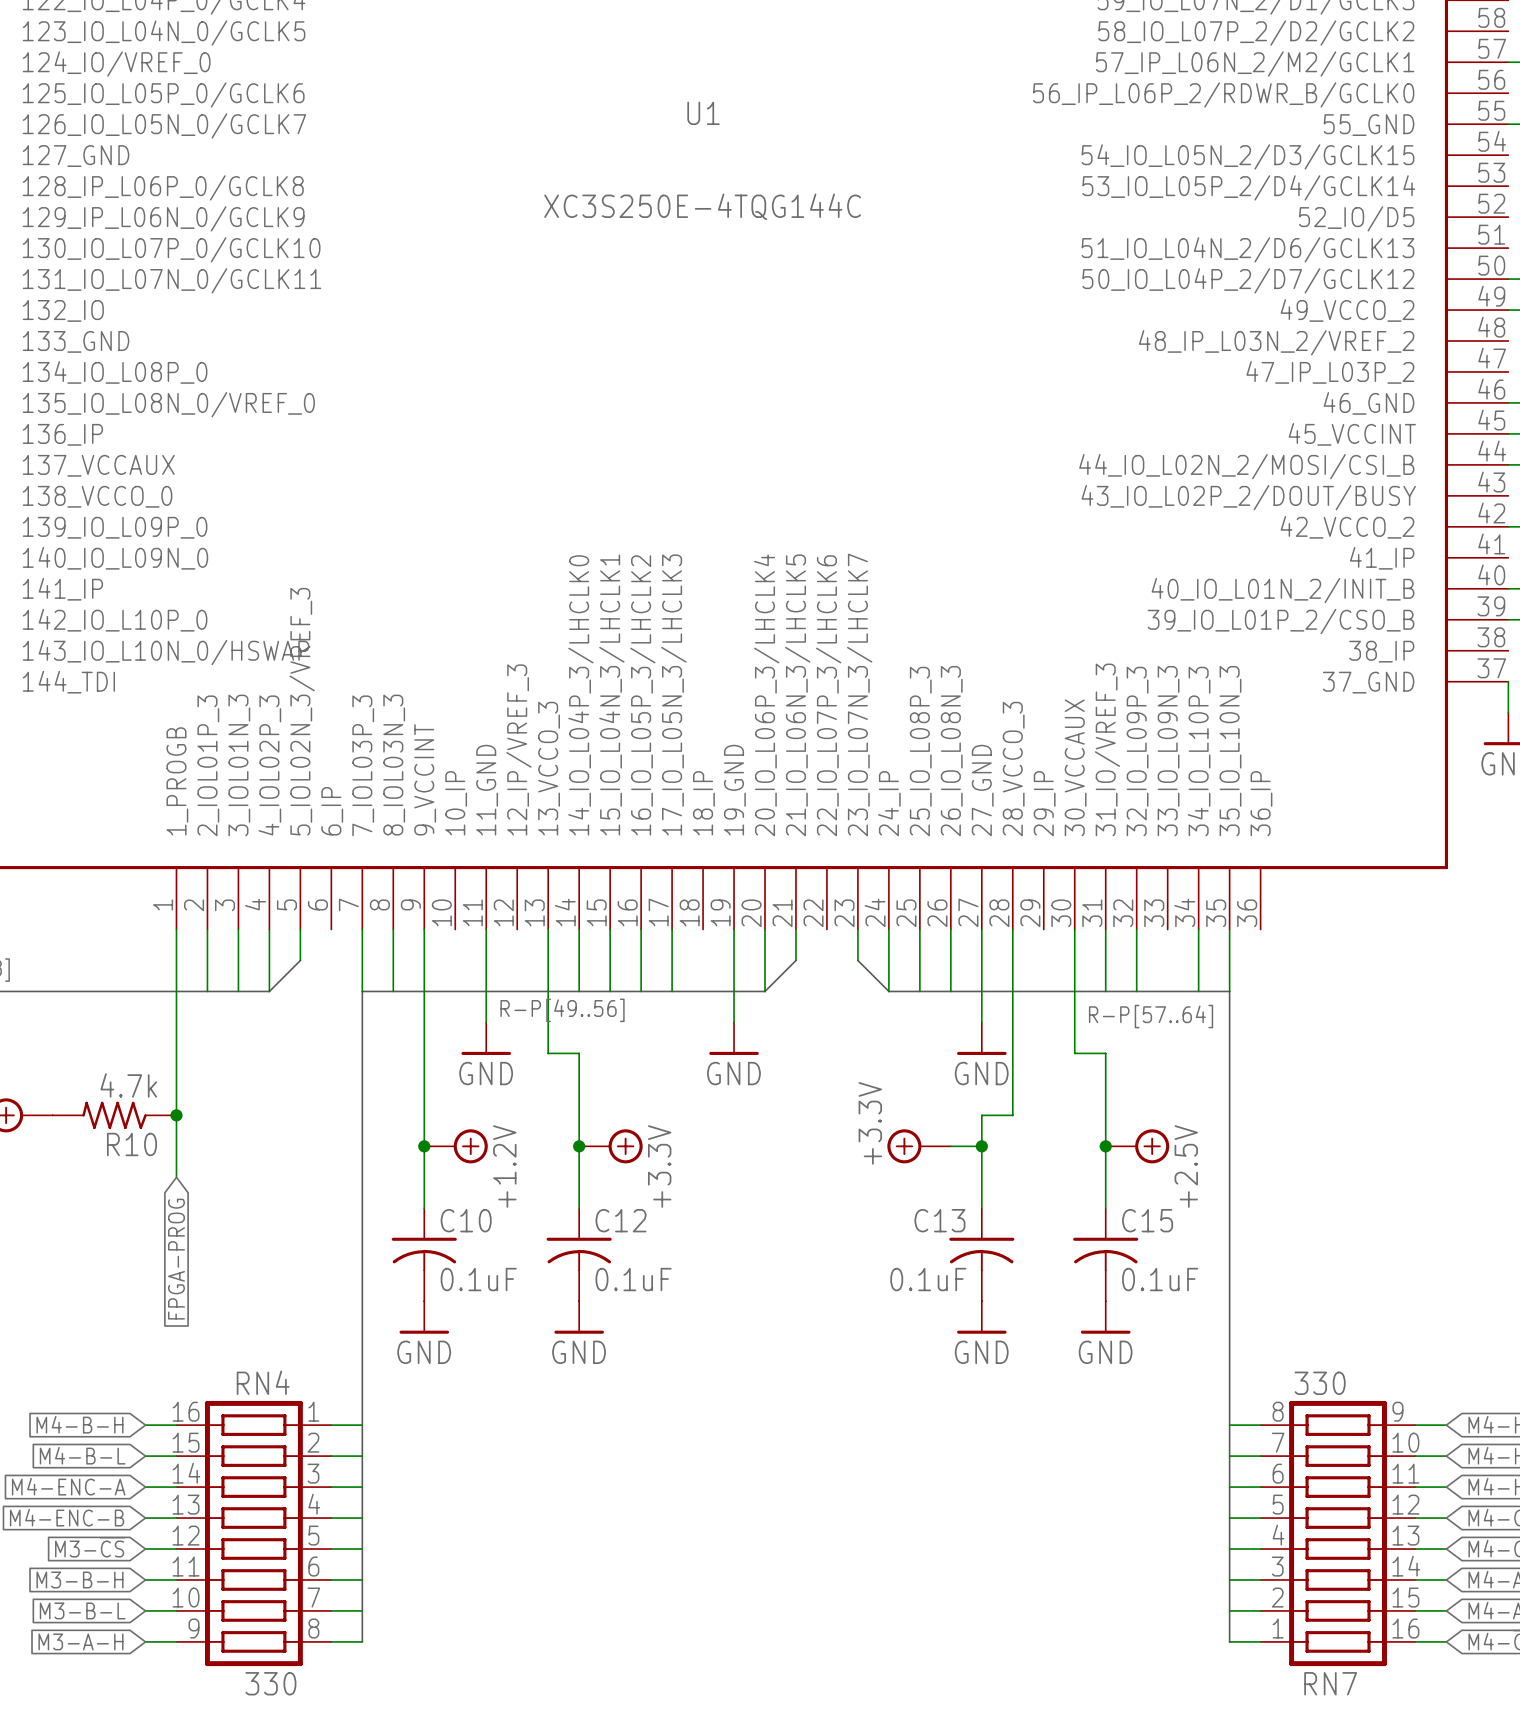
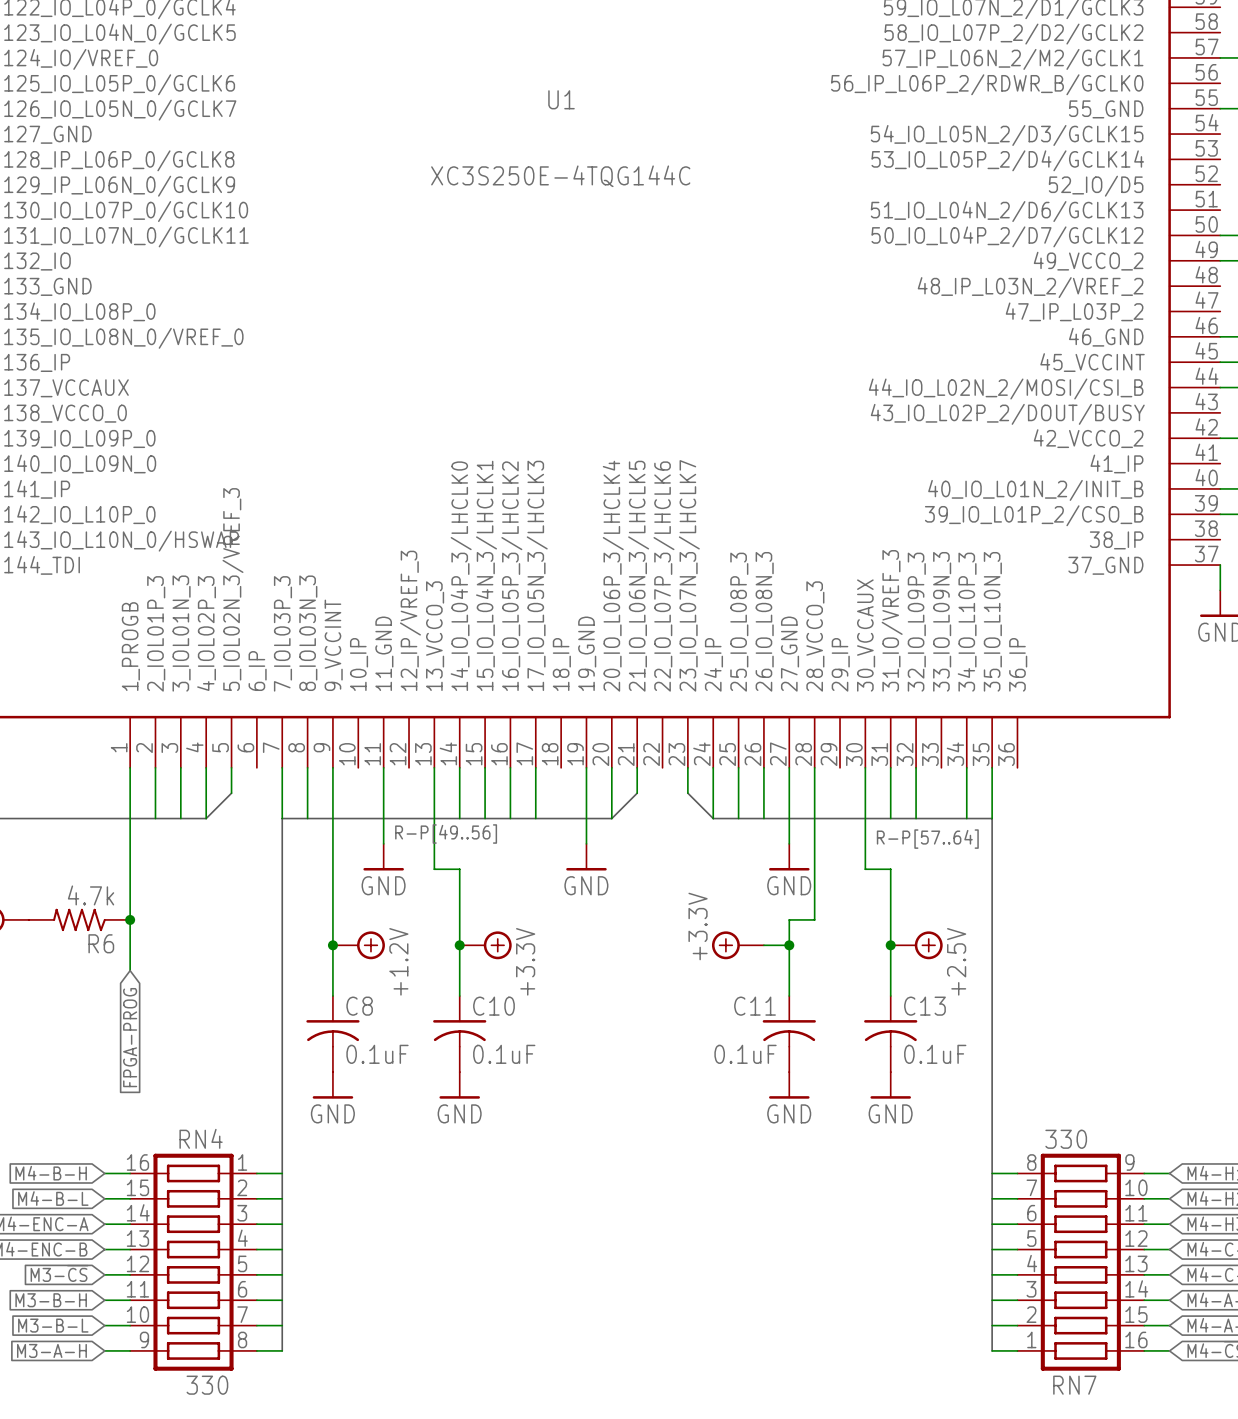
R10 name: R10 (131, 1144) -> R6 (101, 943)
C10 name: C10 (466, 1220) -> C8 (359, 1006)
C12 name: C12 (621, 1220) -> C10 (493, 1006)
C13 name: C13 (939, 1220) -> C11 (755, 1006)
C15 name: C15 (1147, 1220) -> C13 (924, 1006)

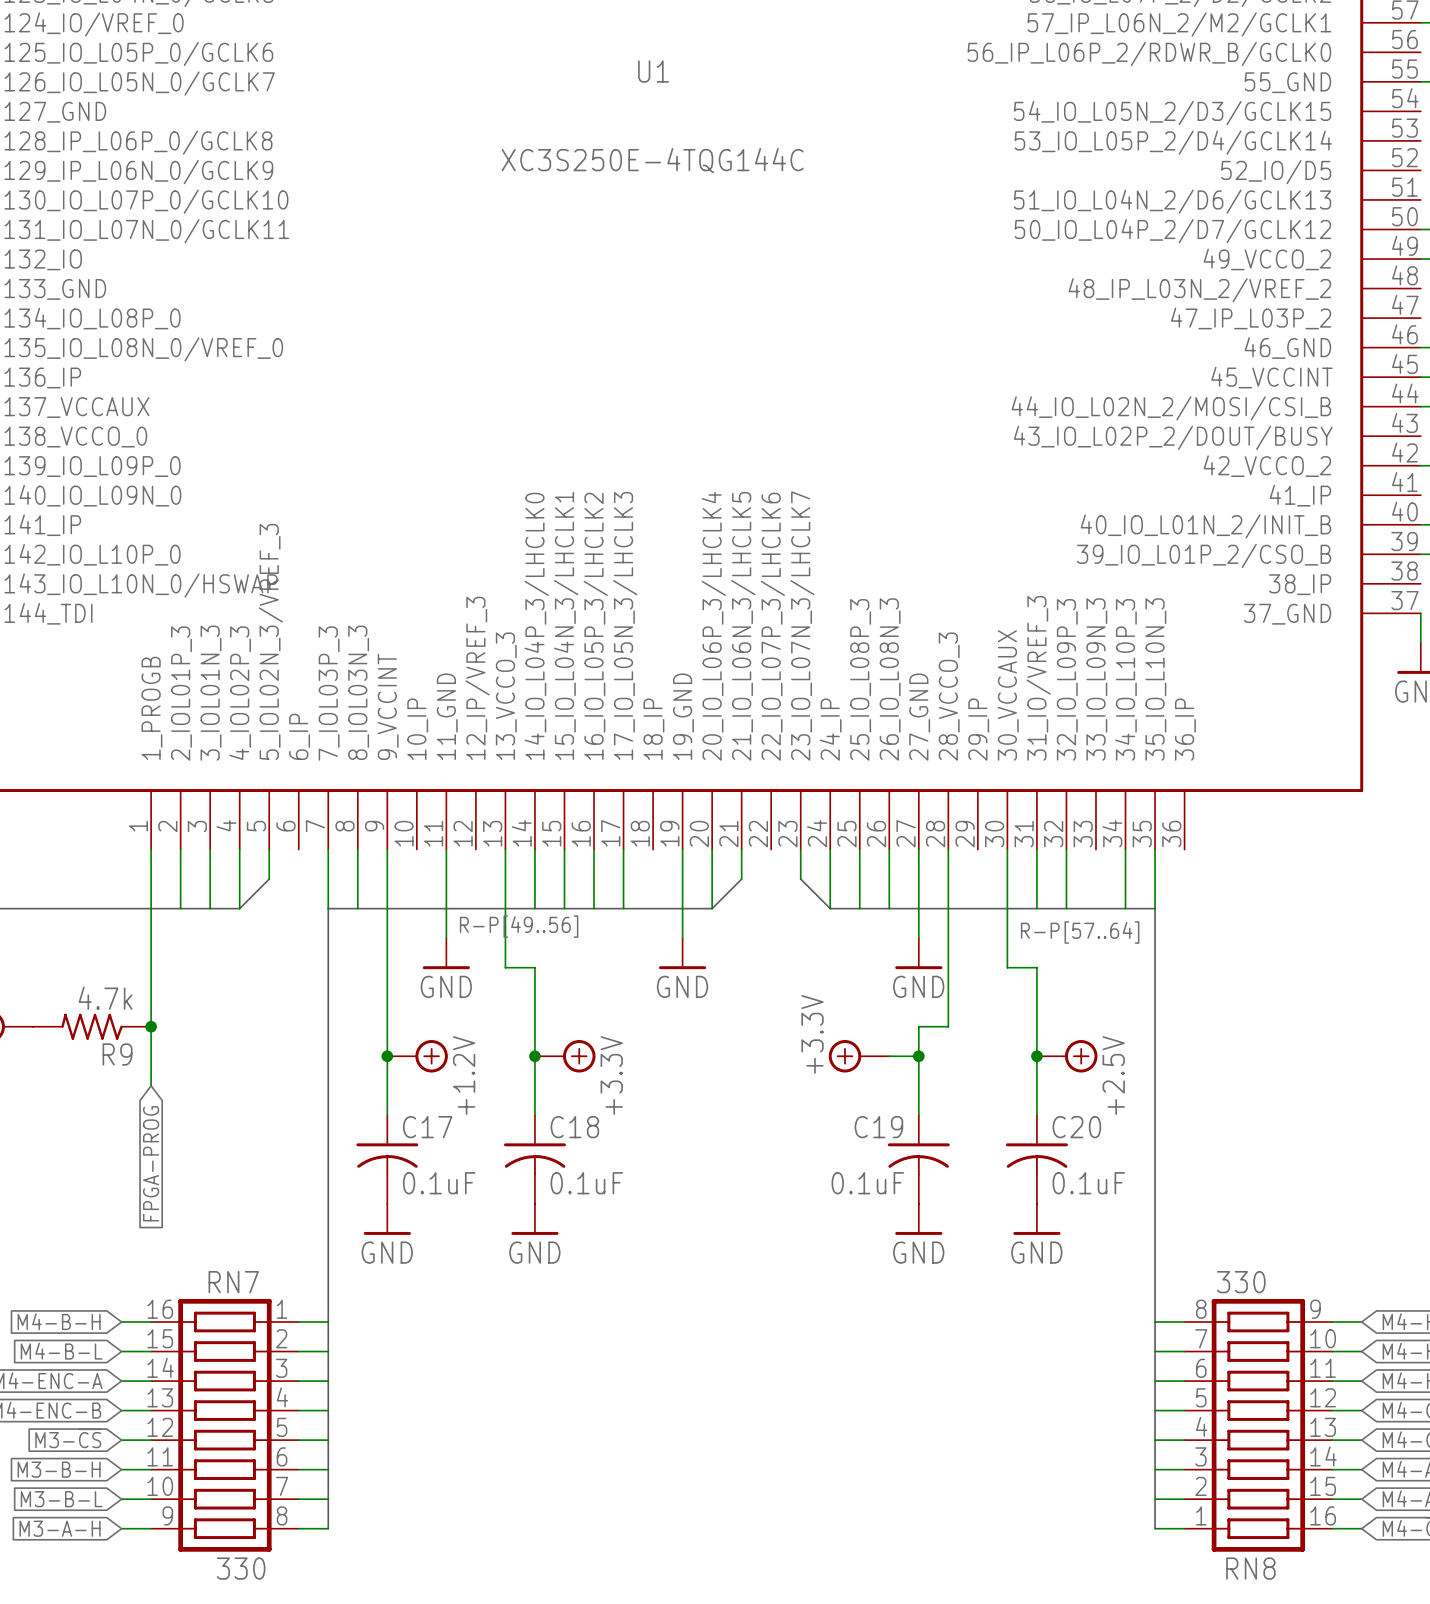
R6 name: R6 (101, 943) -> R9 (117, 1054)
C8 name: C8 (359, 1006) -> C17 (427, 1127)
C10 name: C10 (493, 1006) -> C18 (574, 1127)
C11 name: C11 (755, 1006) -> C19 (878, 1127)
C13 name: C13 (924, 1006) -> C20 (1076, 1127)
RN4 name: RN4 (201, 1138) -> RN7 (233, 1282)
RN7 name: RN7 (1074, 1385) -> RN8 (1250, 1568)

